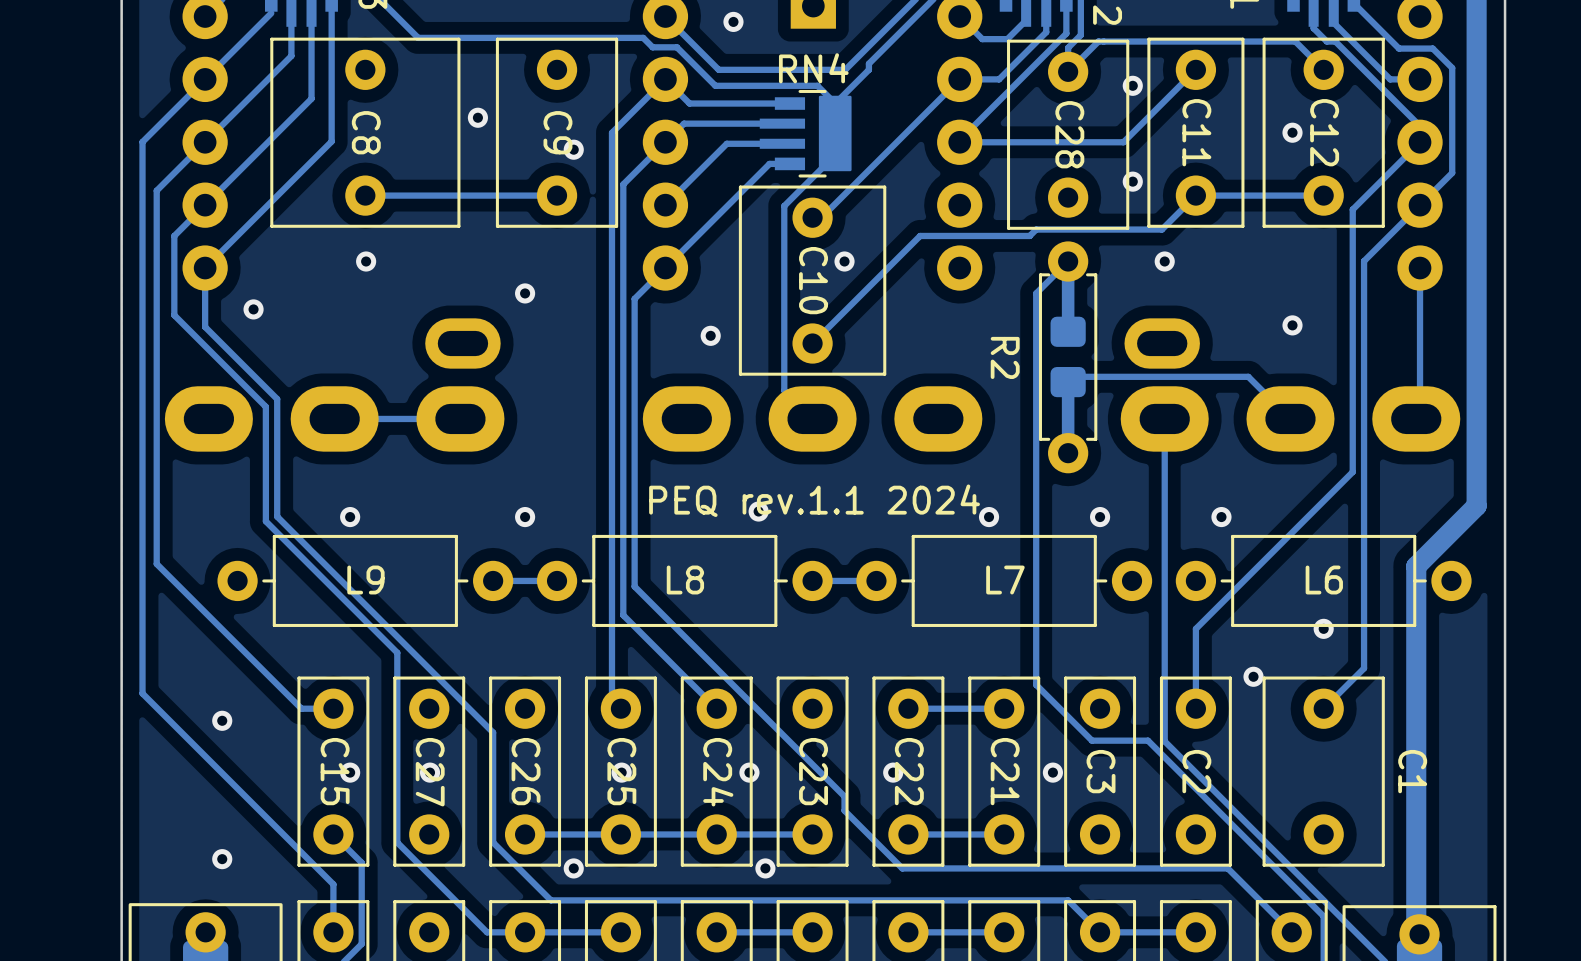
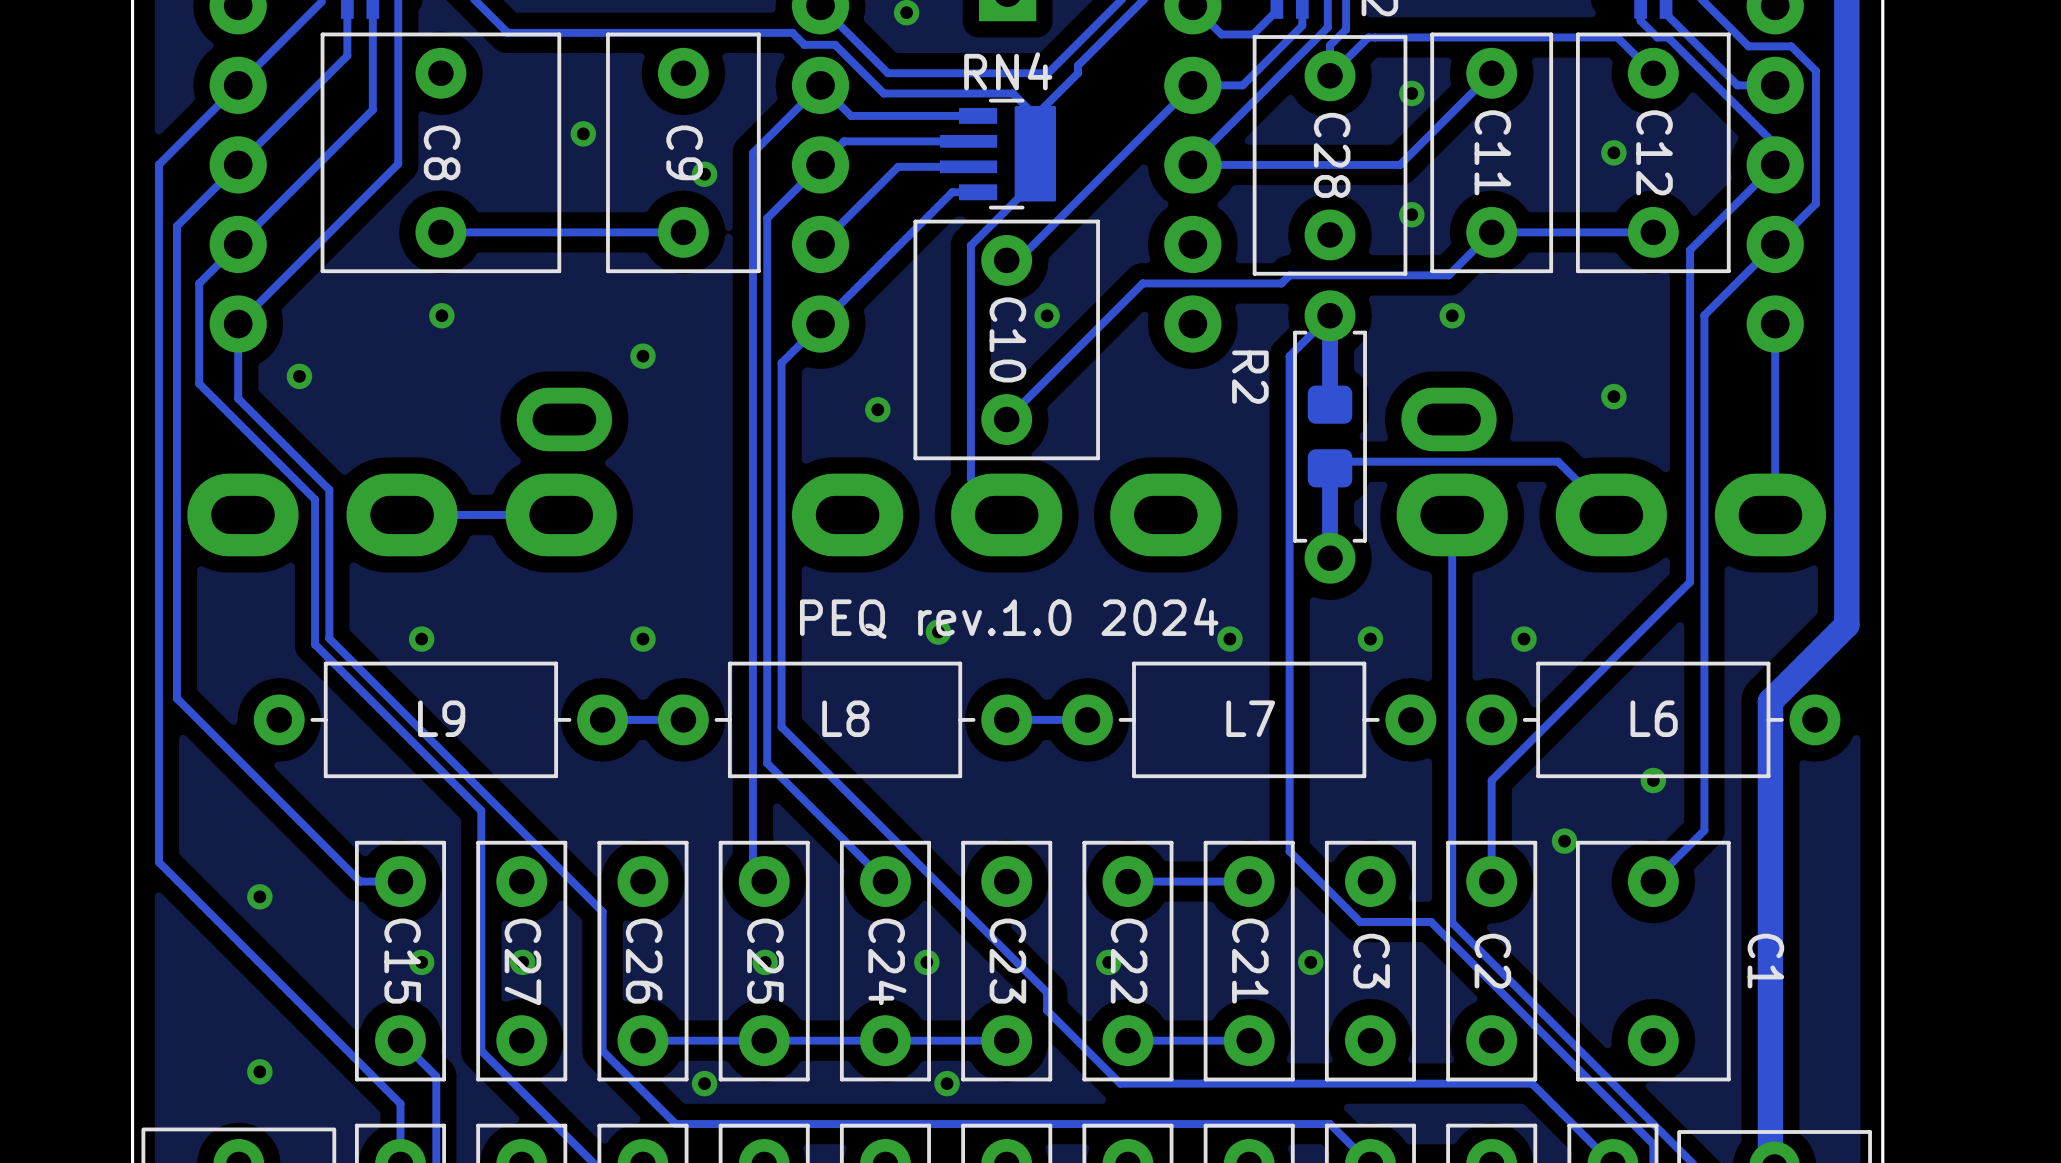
R2 name position: R2 (1005, 357) -> R2 (1250, 377)
text: PEQ rev.1.1 2024 (814, 500) -> PEQ rev.1.0 2024 (1009, 618)

